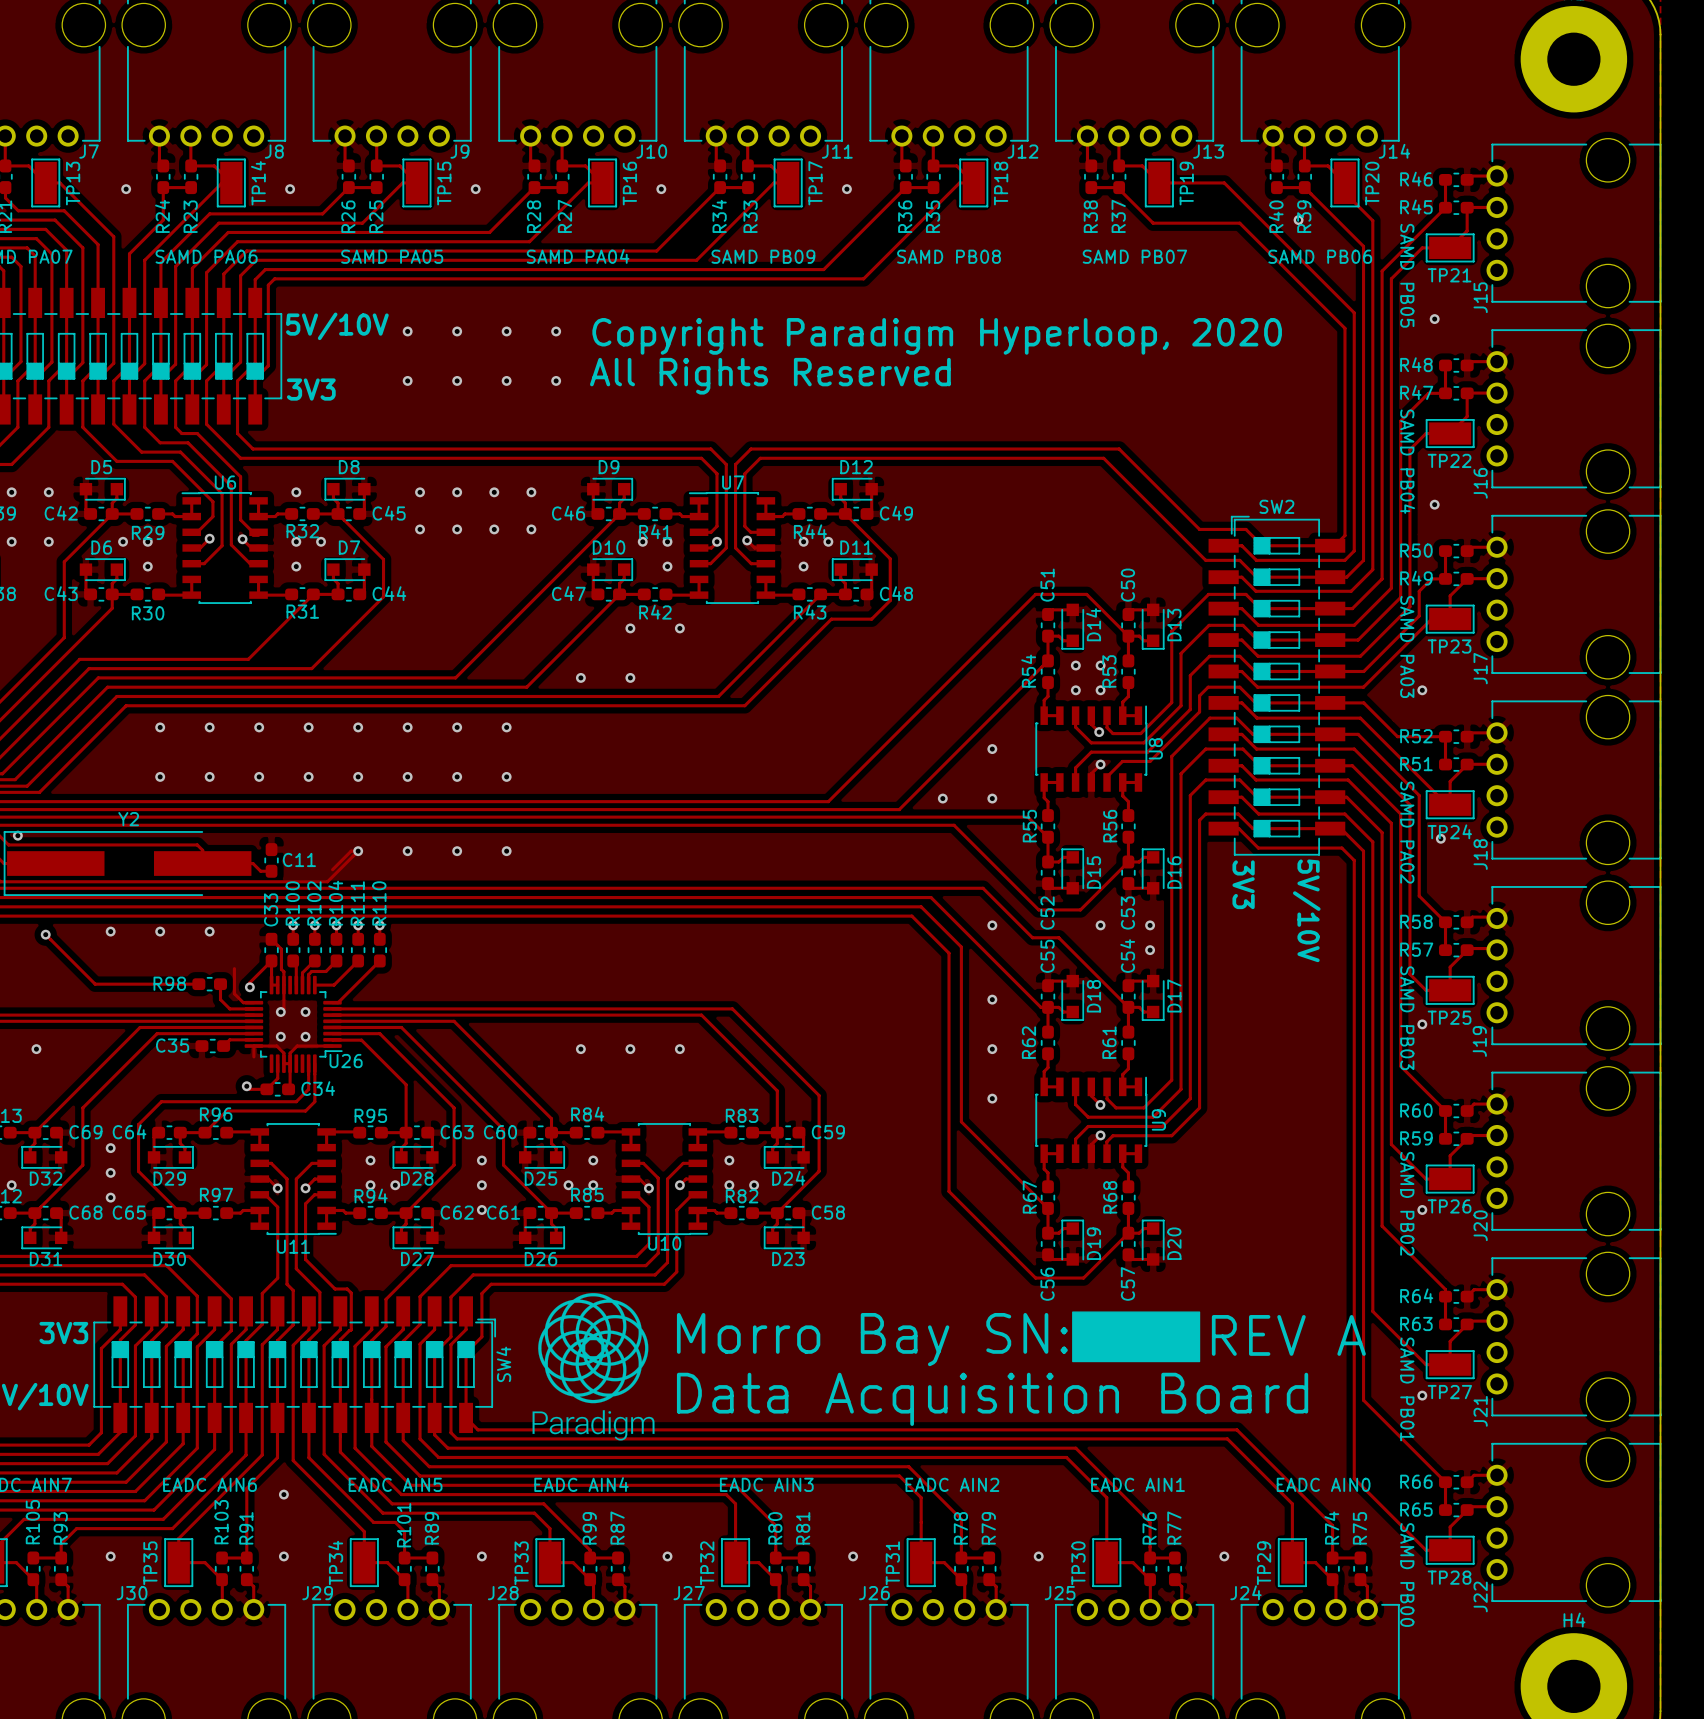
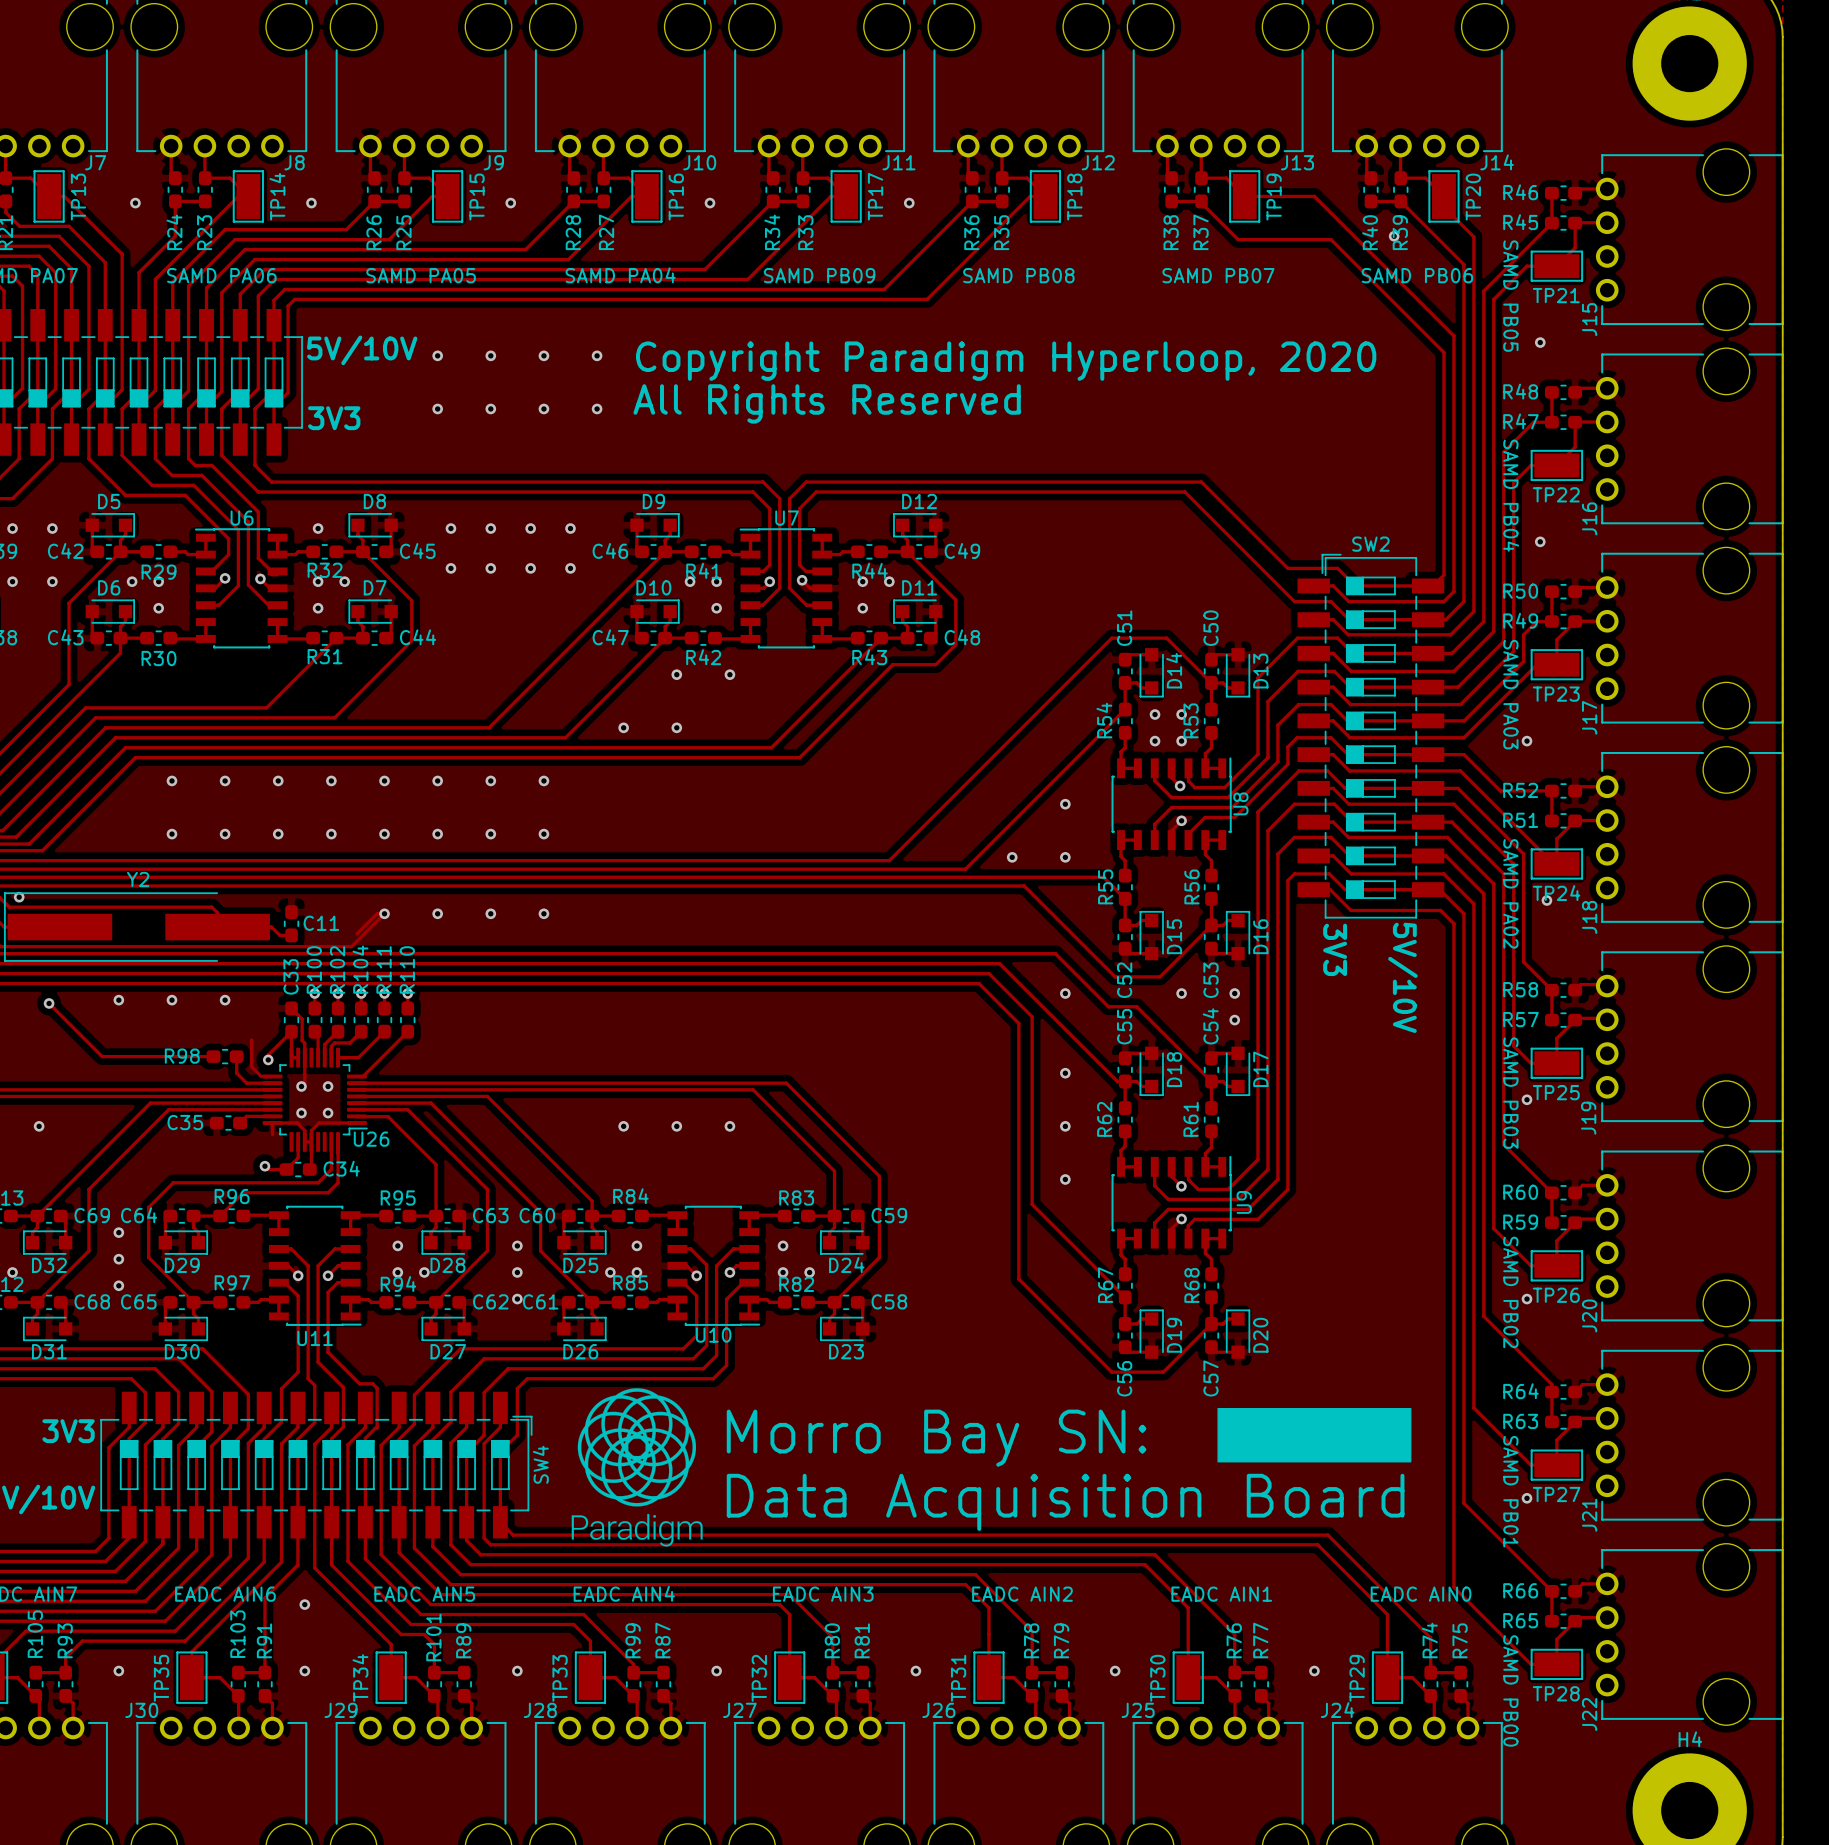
drawing: [1072, 1311, 1201, 1363] -> none
drawing: none -> [1217, 1407, 1412, 1463]
text: REV A (1288, 1335) -> none

